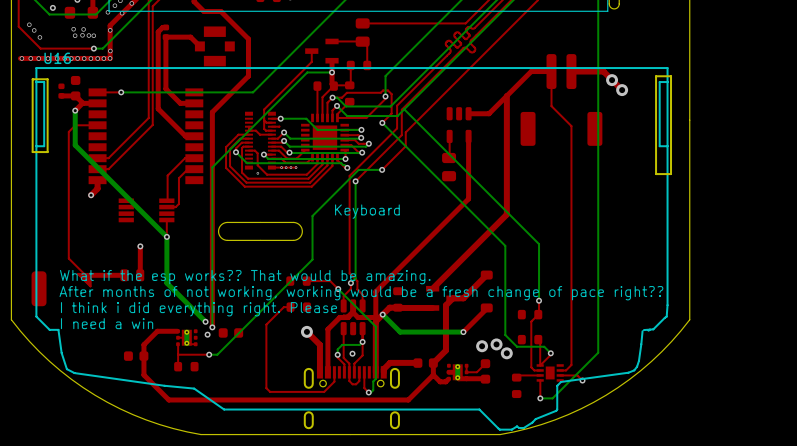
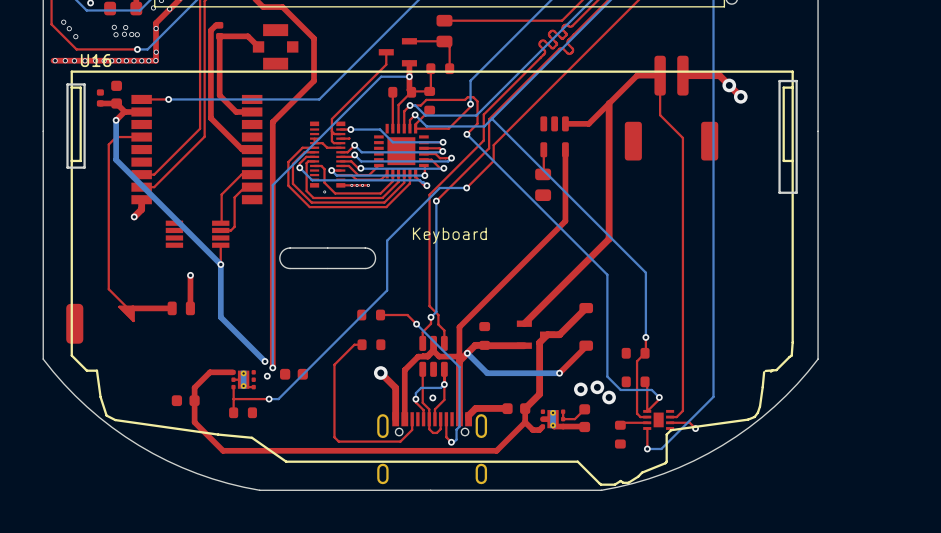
text: What if the esp works?? That would be amazing. (245, 277) -> none
text: After months of not working, working would be a fresh change of pace right?? (361, 293) -> none
text: I think i did everything right. Please (198, 309) -> none
text: I need a win (107, 323) -> none

